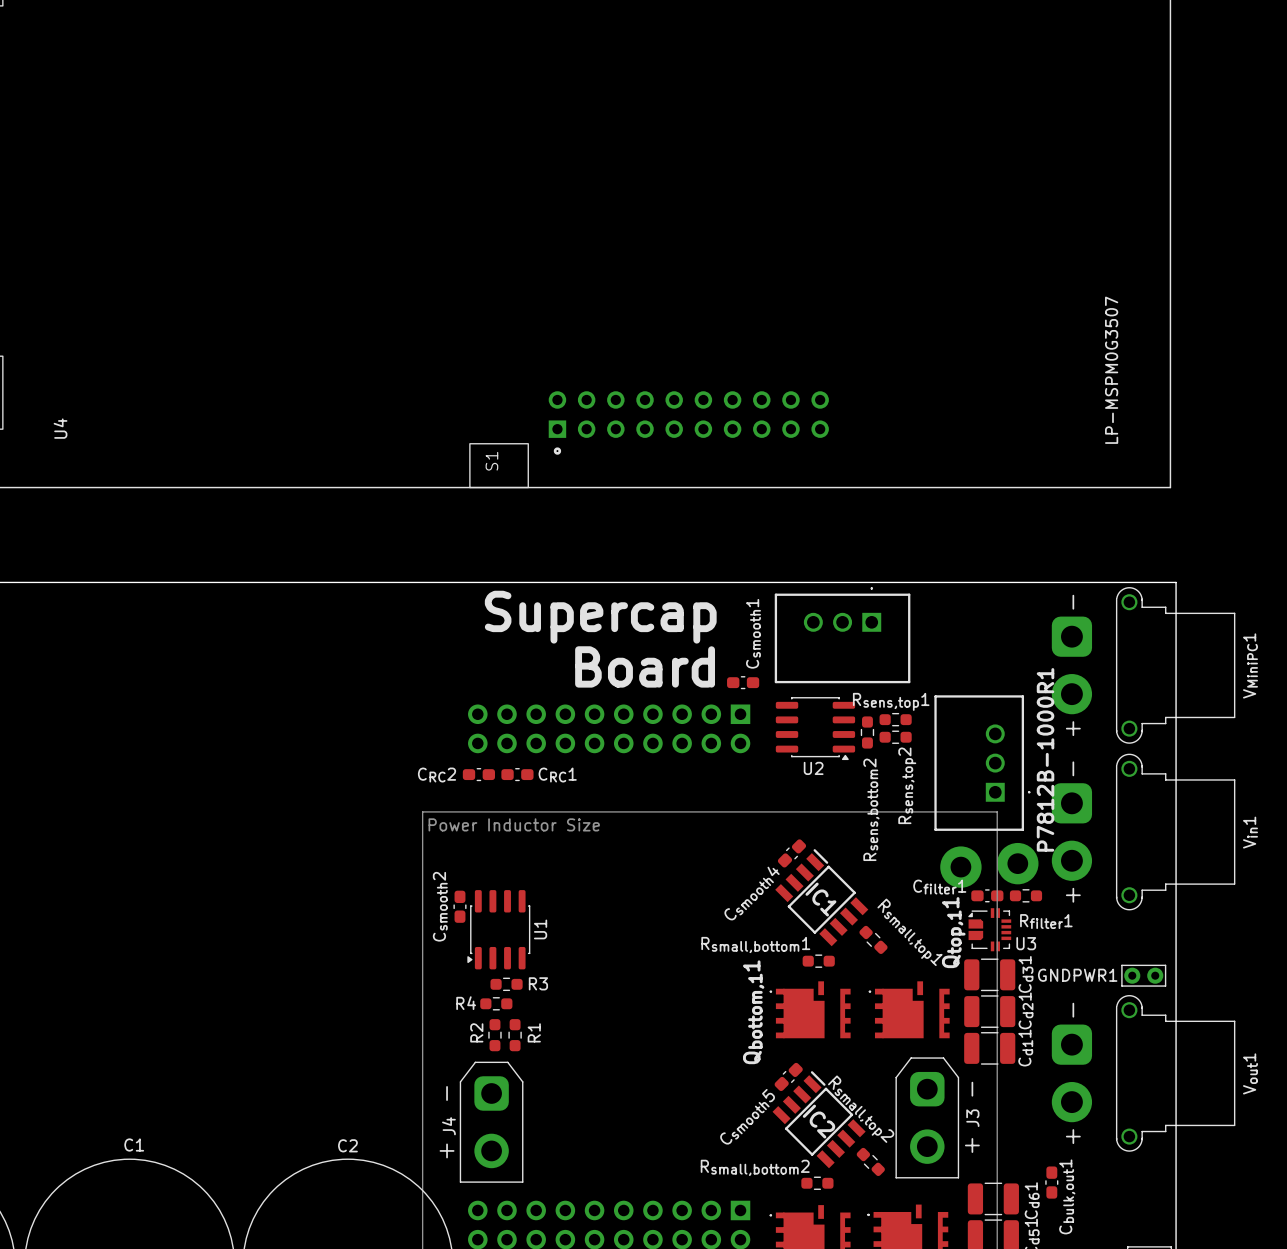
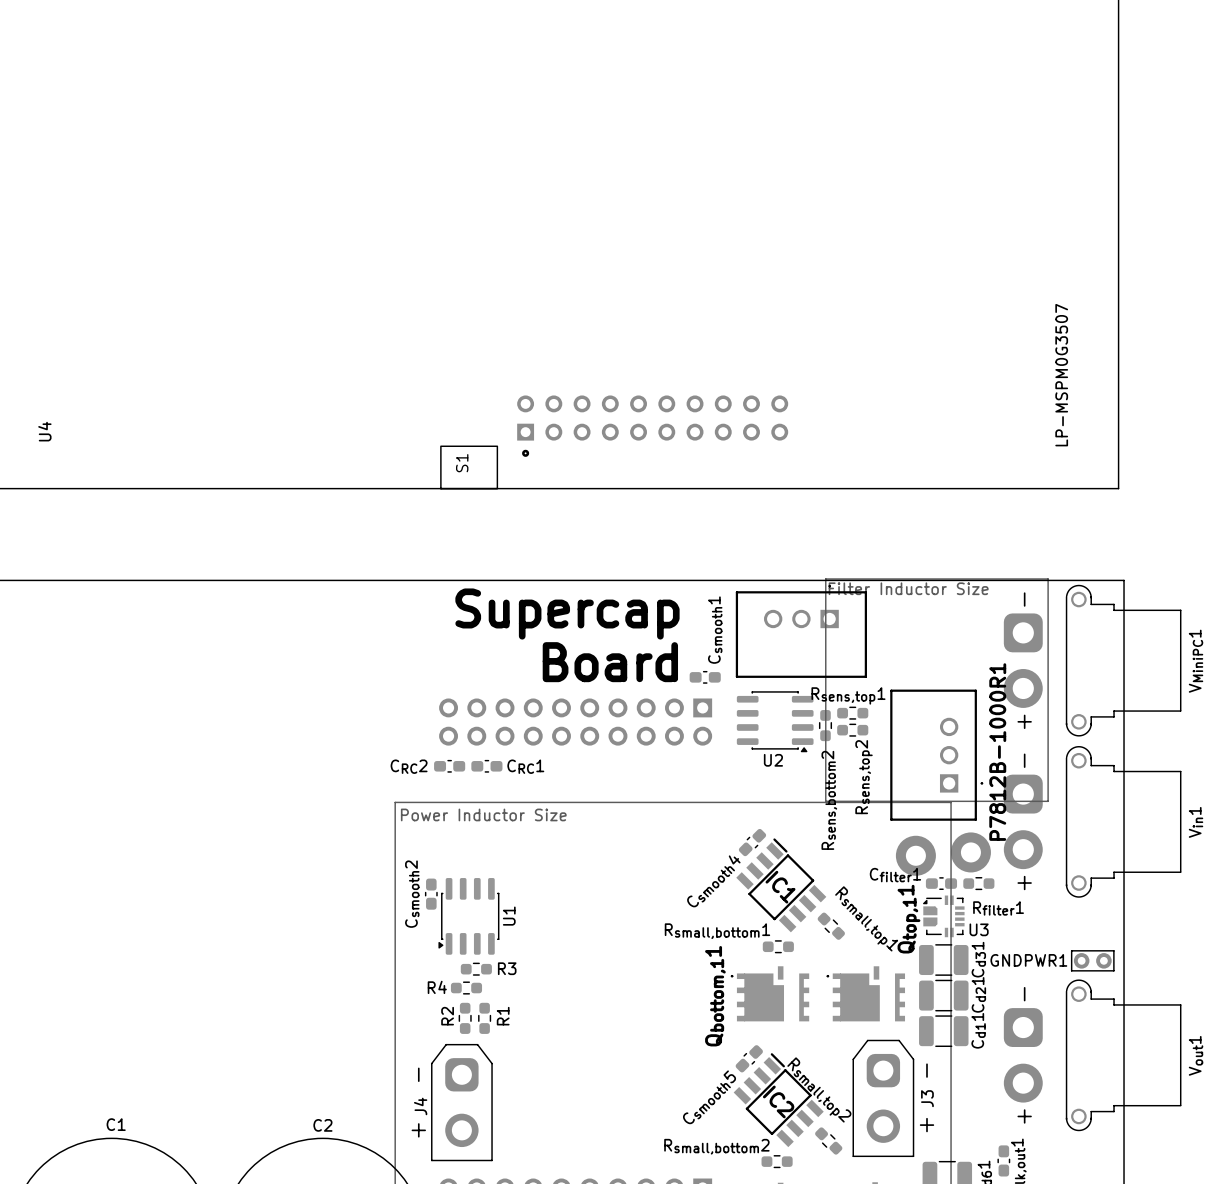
line: none -> (825, 578) (1048, 578) (1048, 801) (825, 801) (825, 578)
text: none -> Filter Inductor Size (908, 588)

